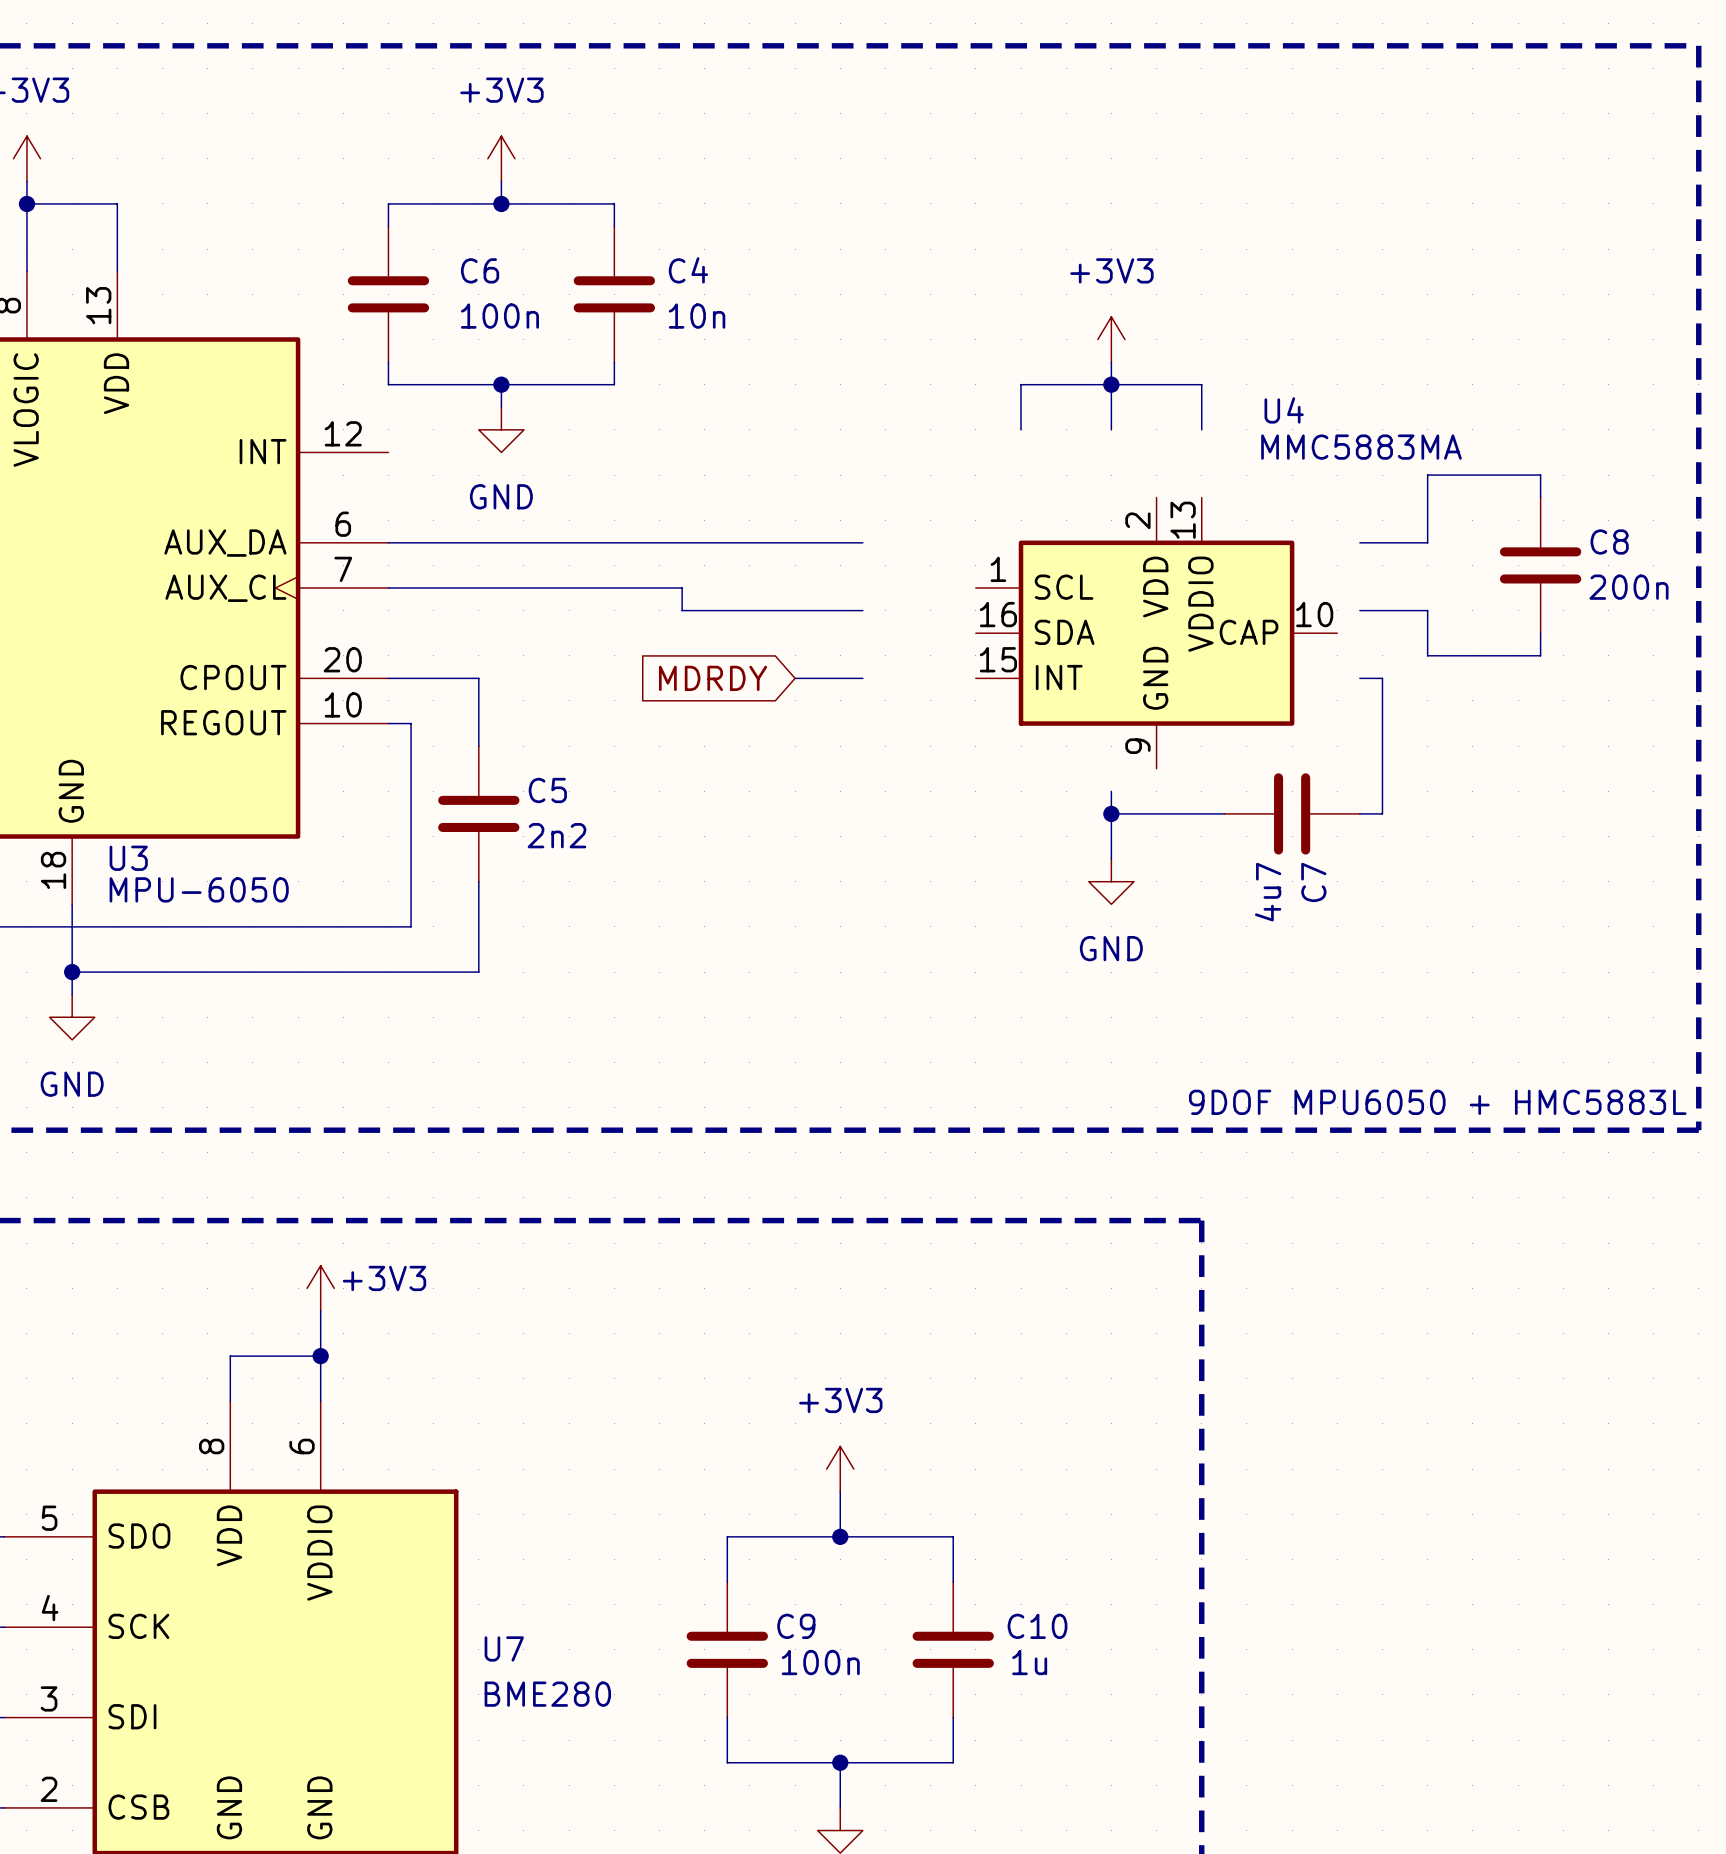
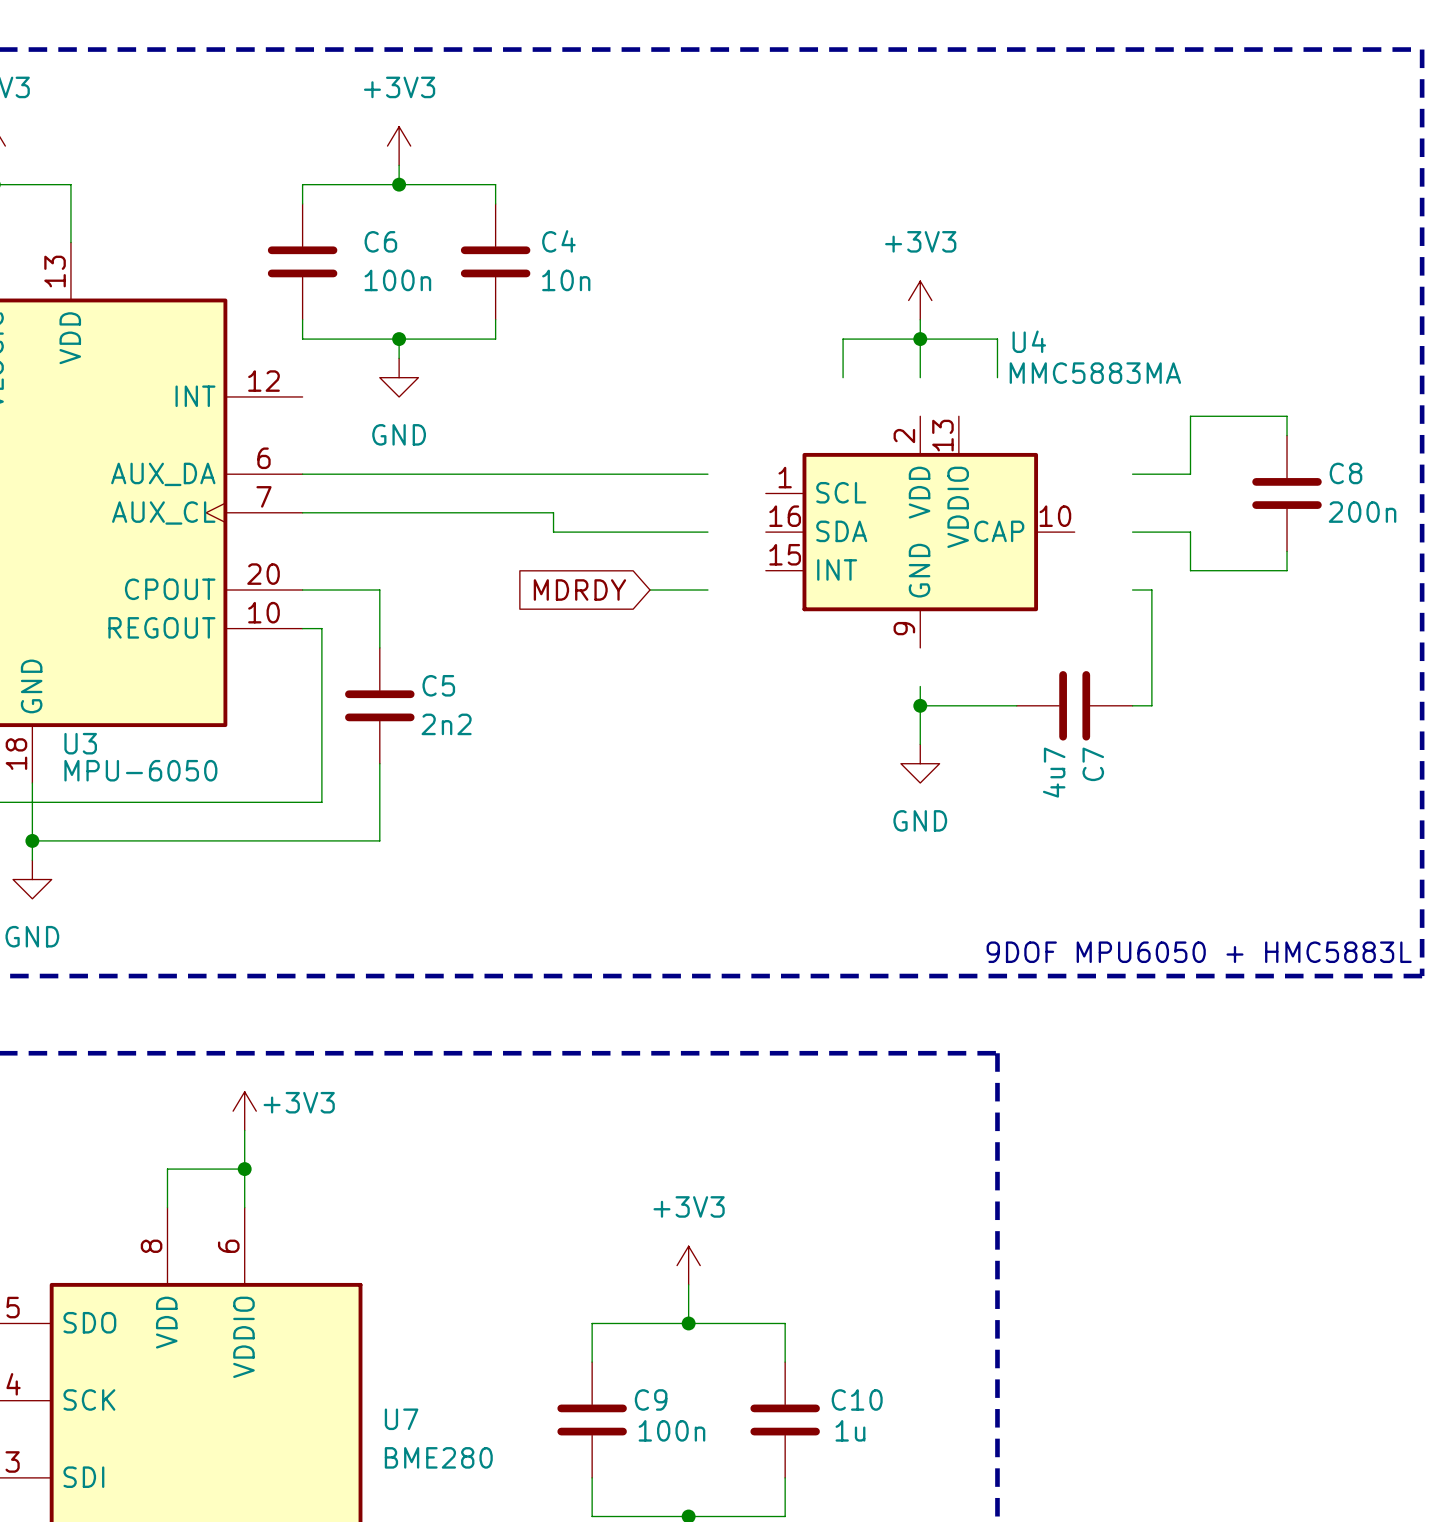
U4 position: (1156, 633) -> (920, 532)

